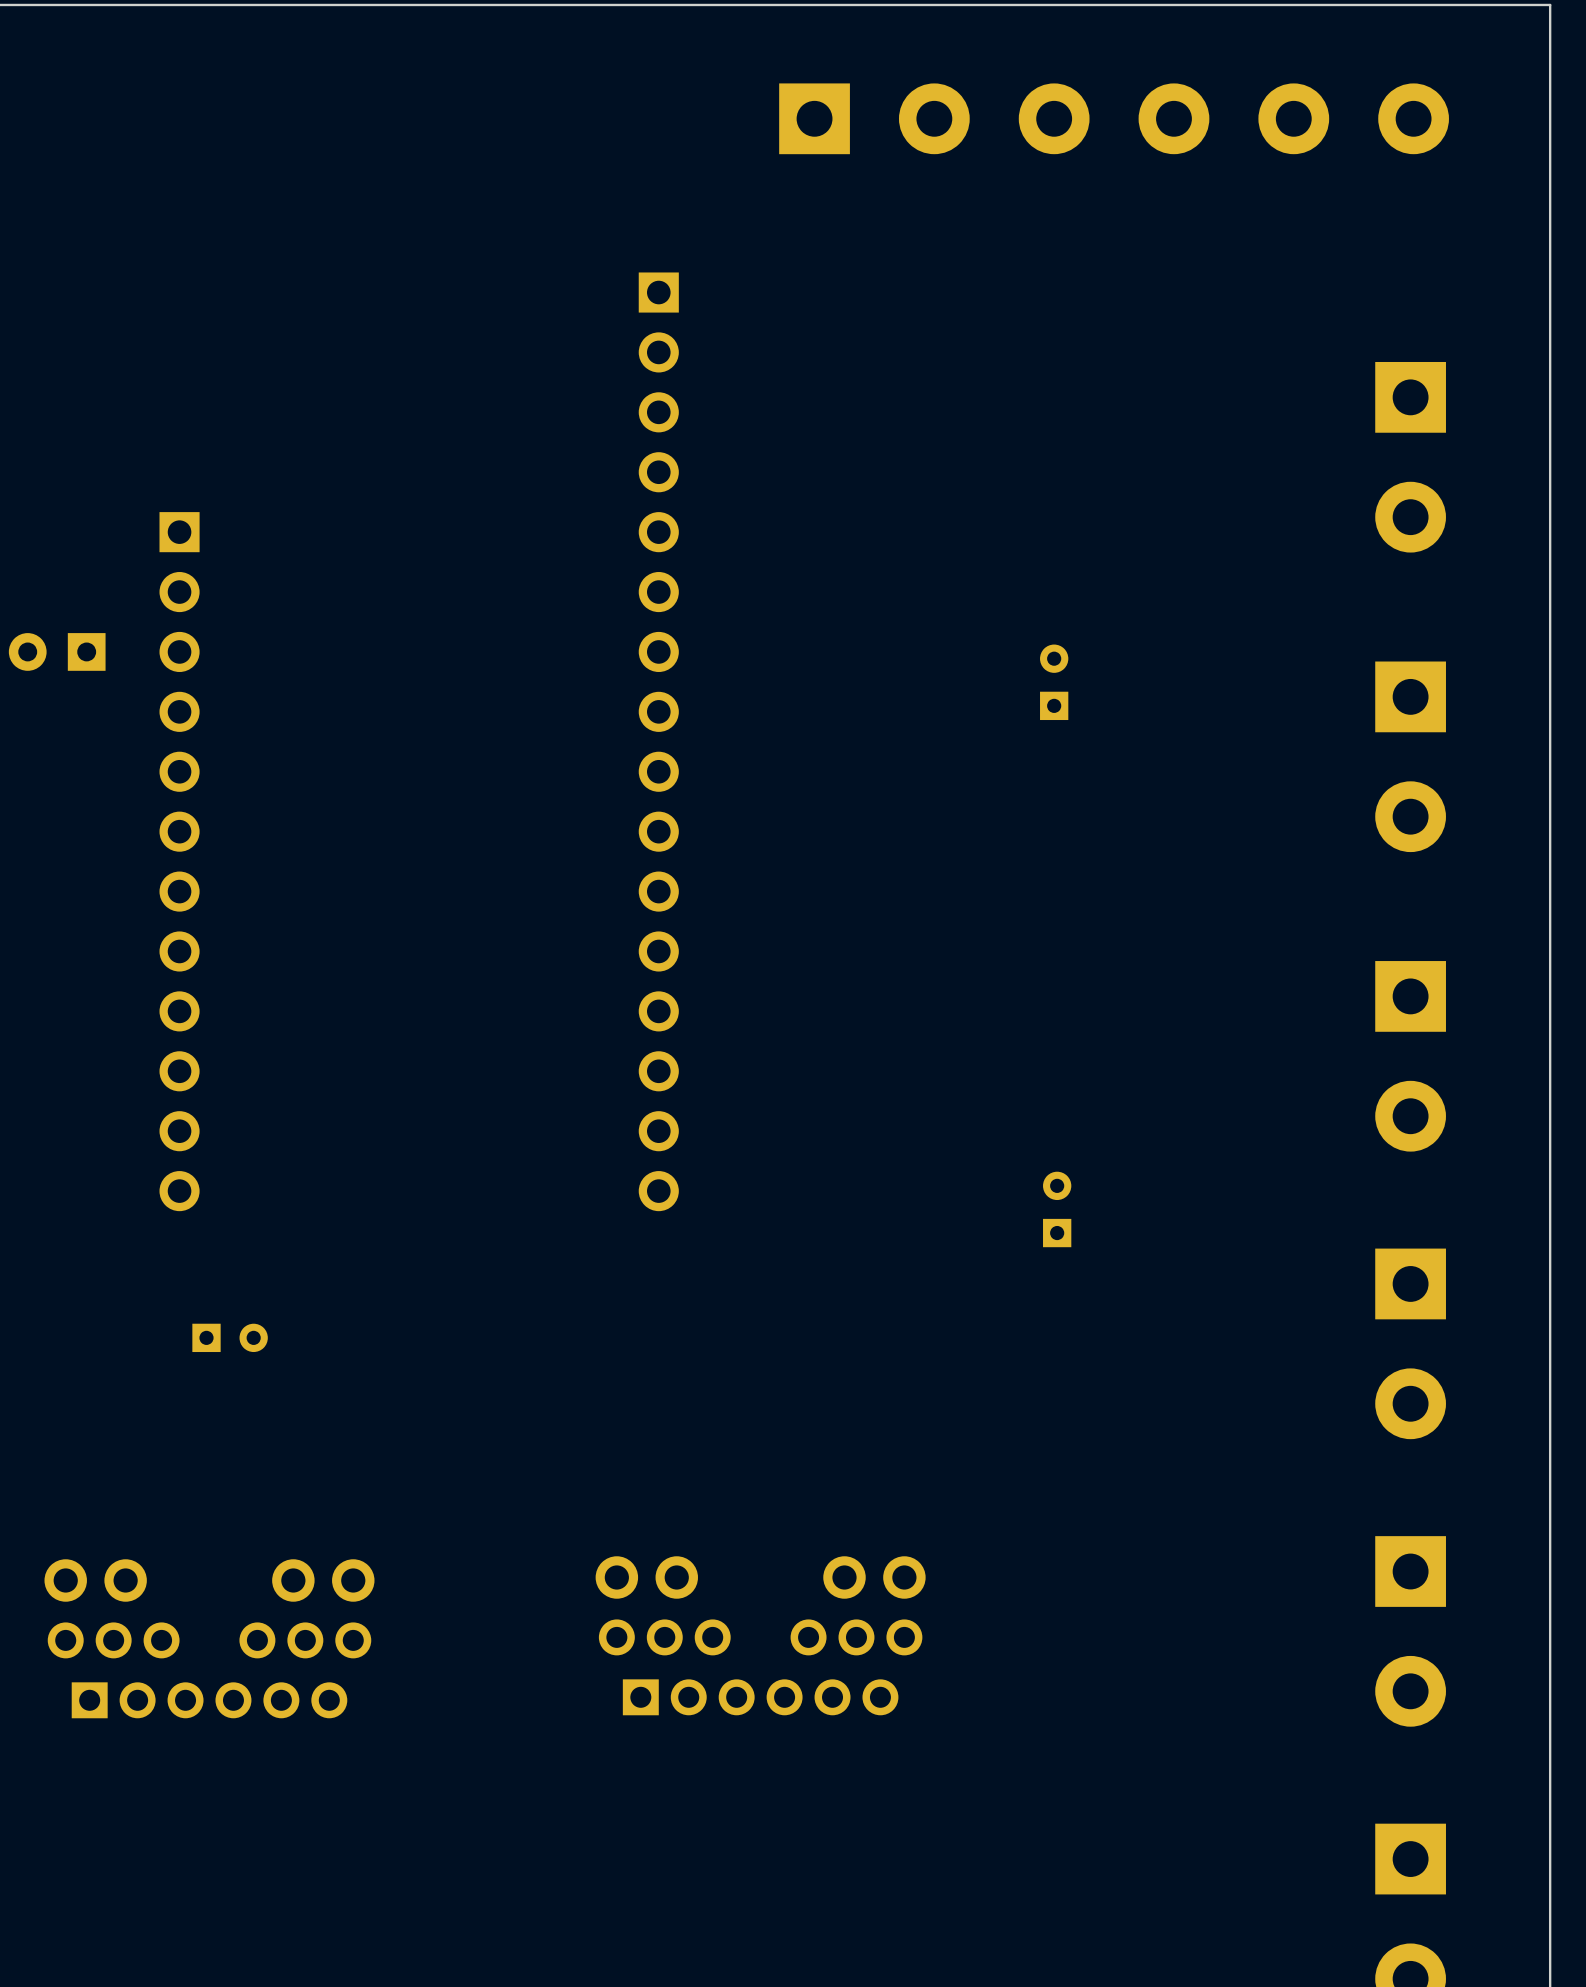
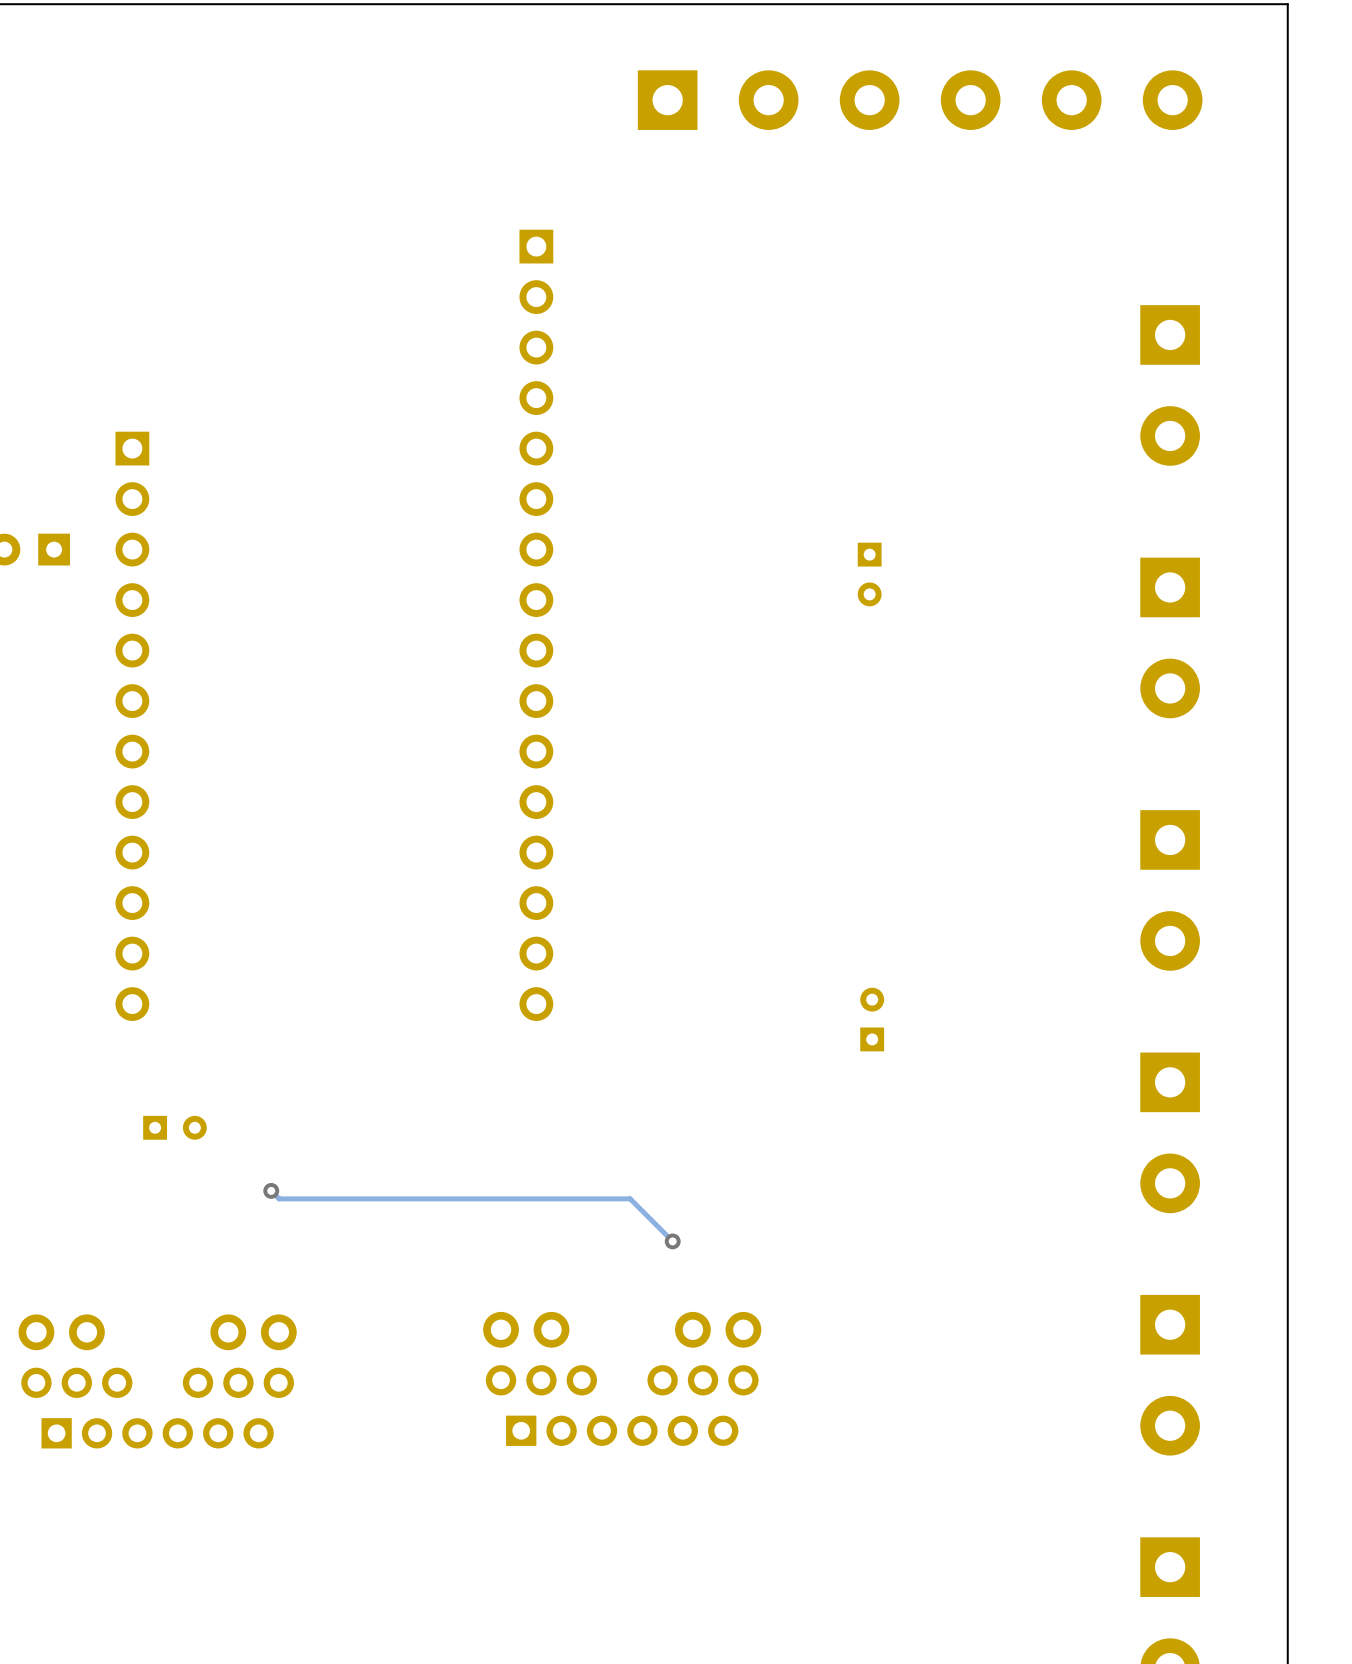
part rotation: 0° (1054, 682) -> 180° (869, 574)
track: none -> (271, 1190) (279, 1198) (630, 1198) (672, 1241)
via: none -> (271, 1190)
via: none -> (672, 1241)

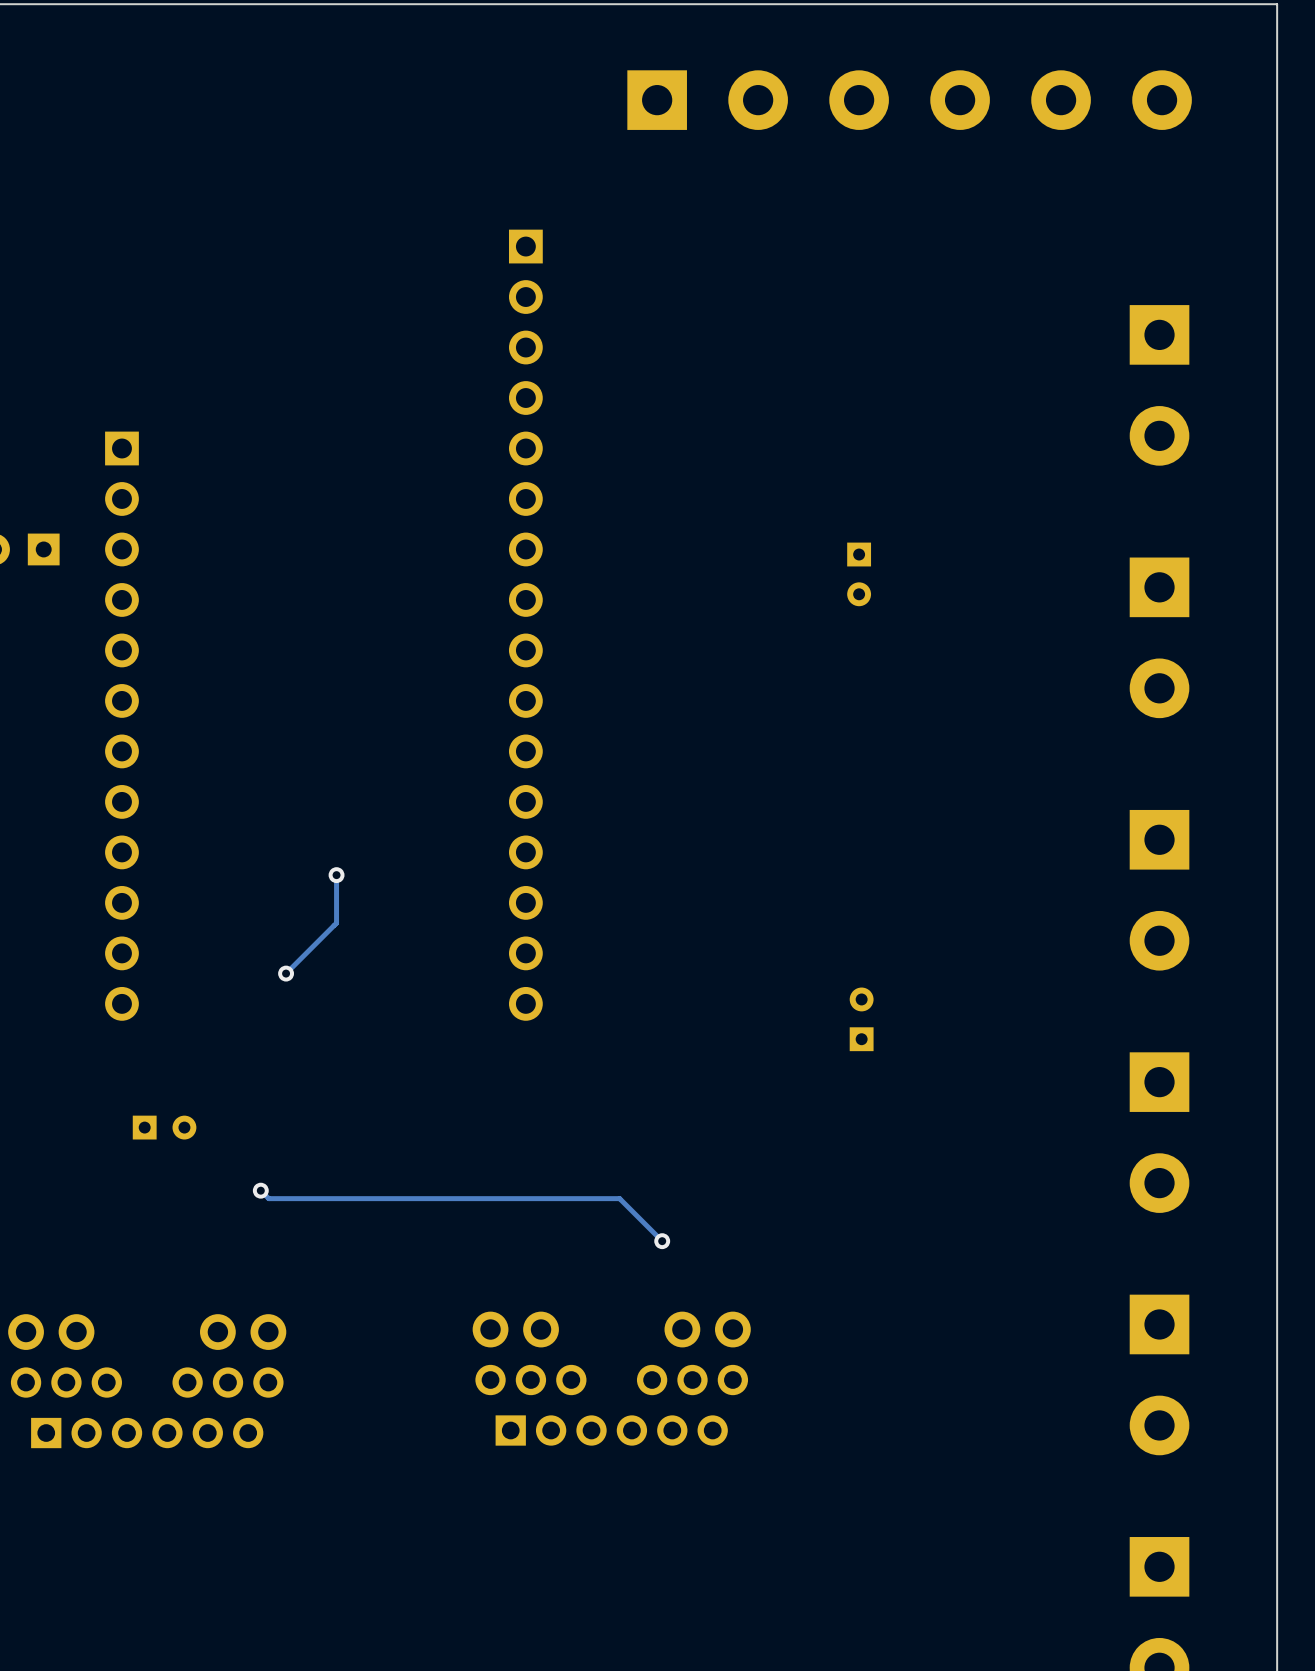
track: none -> (336, 875) (336, 923) (286, 973)
via: none -> (336, 875)
via: none -> (286, 973)

